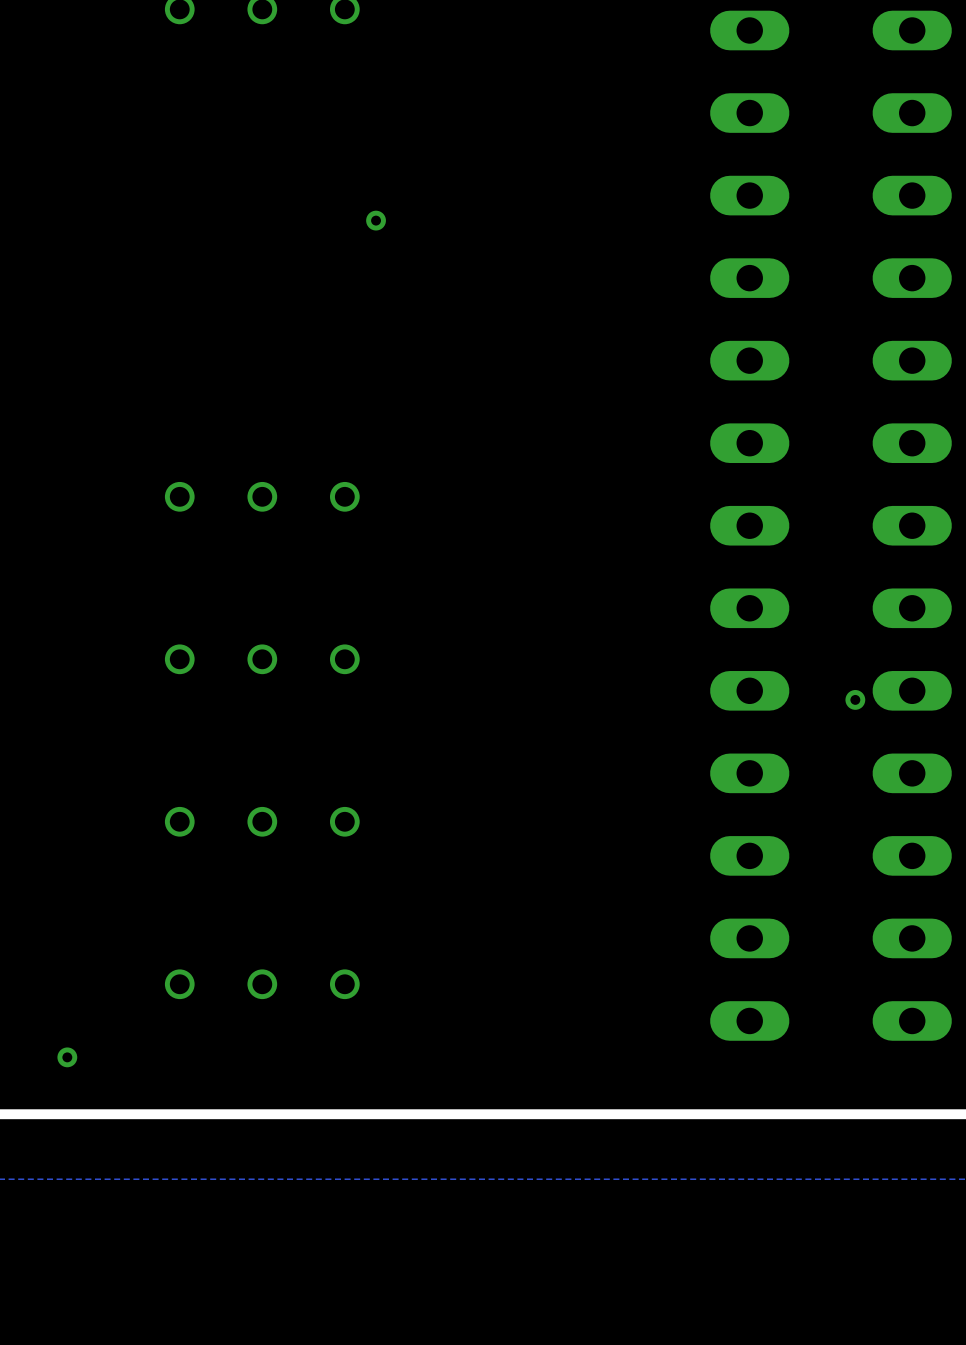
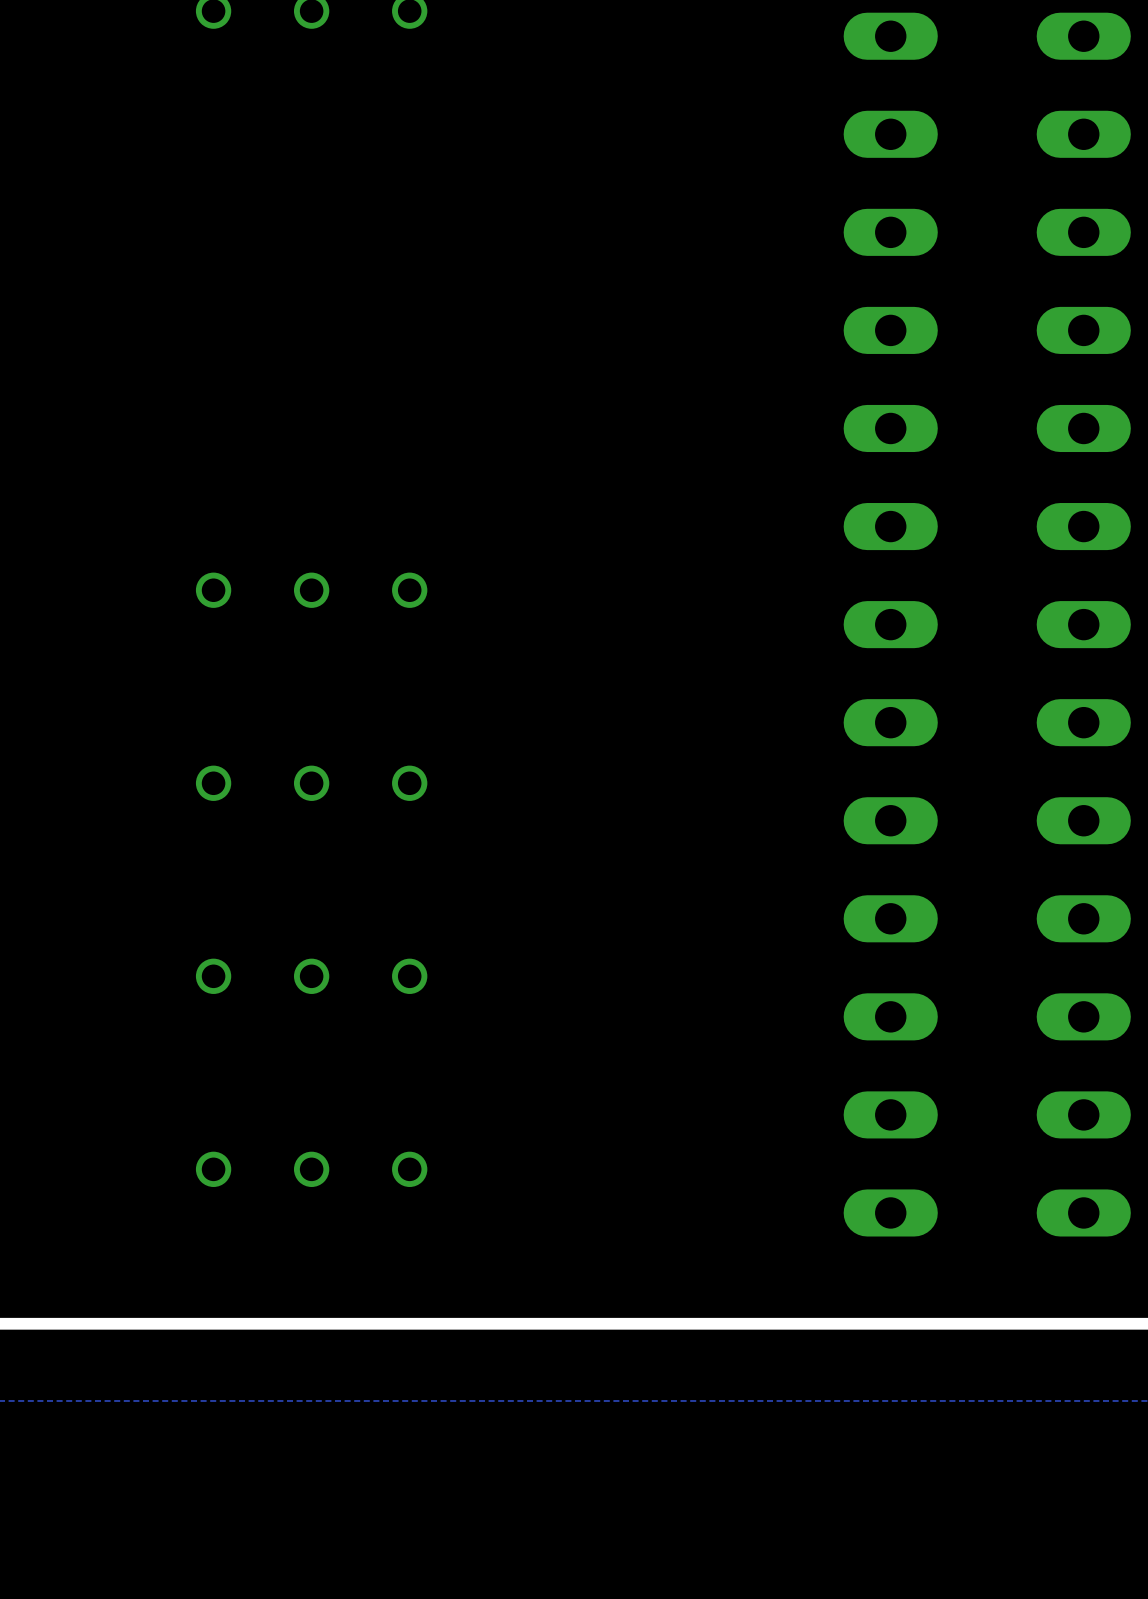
via: (376, 220) -> none
via: (855, 699) -> none
via: (67, 1057) -> none

